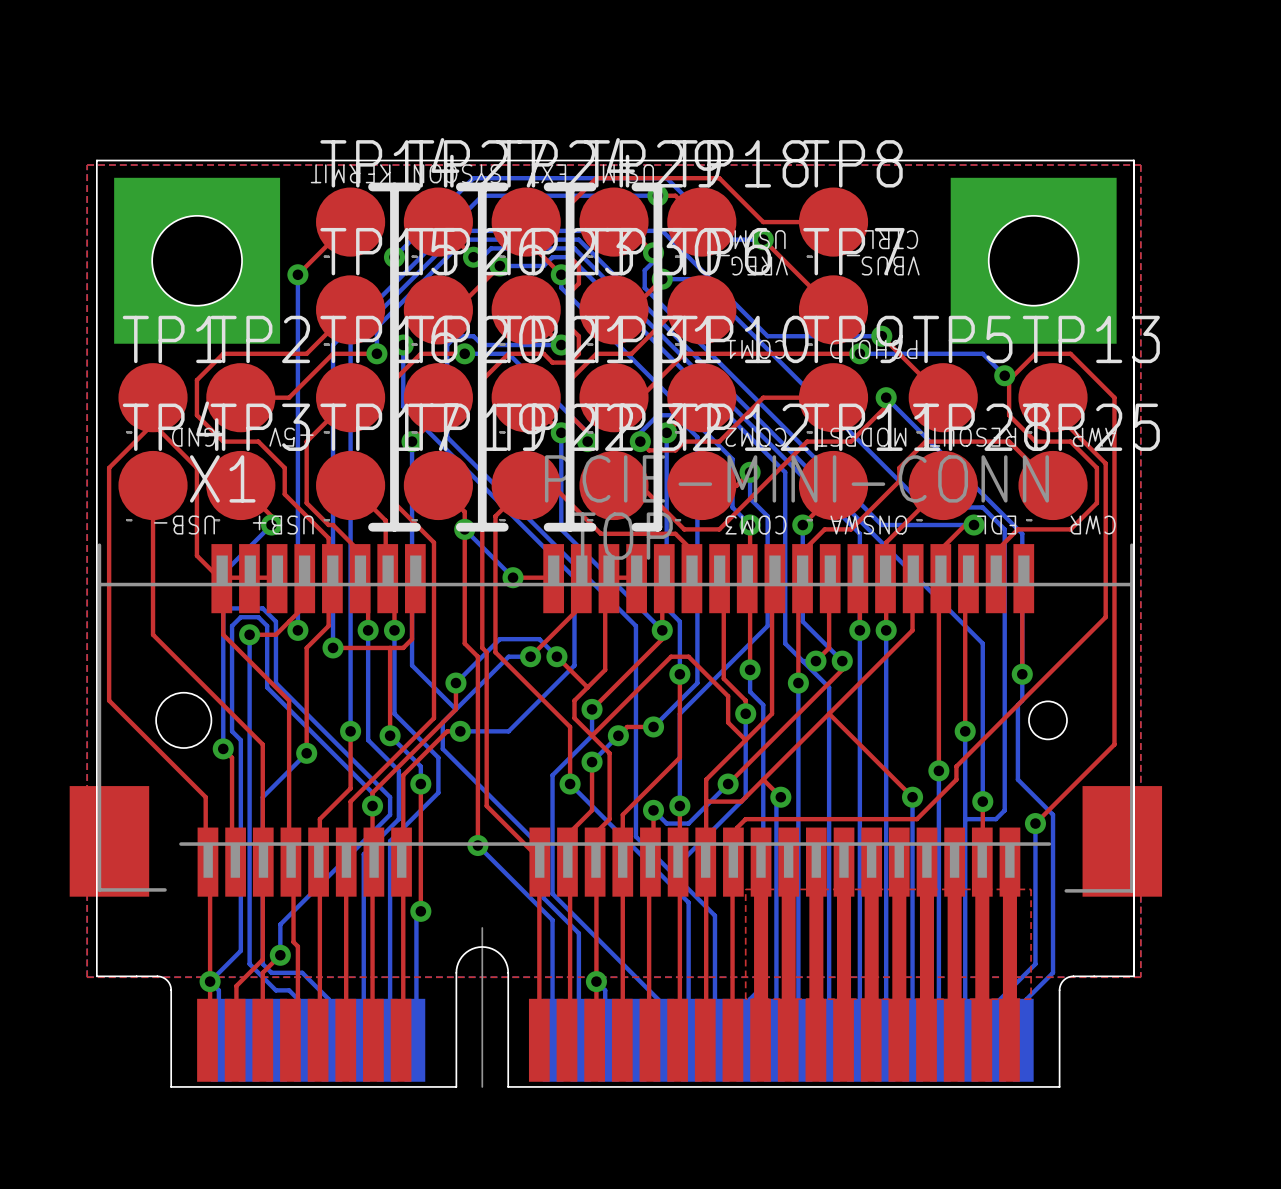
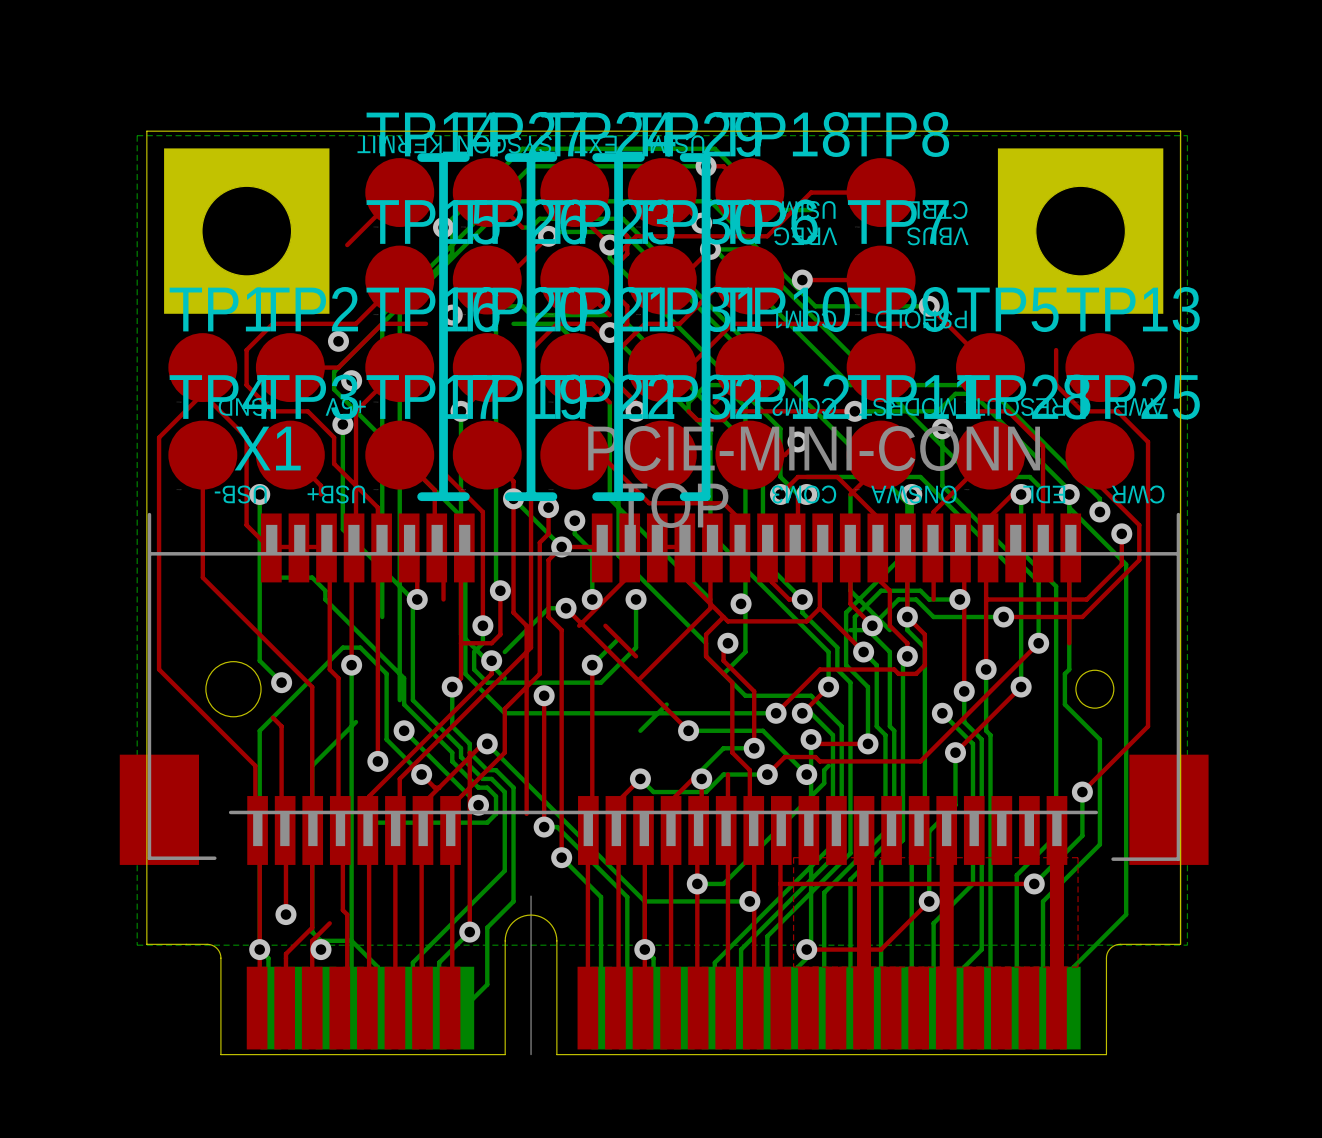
top zone outline: (87, 165) (1140, 165) (1140, 977) (87, 977) (87, 165) -> none
top track: (570, 204) (596, 178) (719, 178) (763, 222) -> (618, 253) (636, 236) (767, 236) (811, 192)
top track: (763, 239) (833, 309) -> (802, 280) (881, 280)
via: (763, 239) -> none
bottom track: (653, 252) (653, 261) (644, 270) (644, 287) (881, 525) (974, 525) -> none
bottom track: none -> (452, 227) (452, 253) (334, 371) (334, 389) (465, 520) (465, 673) (504, 713) (776, 713)
via: (473, 257) -> none
bottom track: (574, 261) (570, 257) (552, 257) (543, 265) (499, 265) -> (622, 231) (535, 231)
bottom track: (297, 274) (297, 630) -> none
via: (297, 274) -> none
bottom track: none -> (706, 253) (719, 253) (850, 385) (986, 385) (1099, 498) (1099, 511)
via: none -> (802, 280)
bottom track: (403, 345) (403, 406) (574, 577) (574, 665) (570, 669) -> none
via position: (561, 345) -> (609, 332)
bottom track: (376, 353) (376, 327) (464, 239) (578, 239) (982, 643) (982, 801) -> none
via: (376, 353) -> none
top track: (464, 353) (420, 353) (394, 380) -> none
via: (464, 353) -> none
bottom track: (859, 353) (982, 353) (1004, 375) -> none
via: (859, 353) -> none
bottom track: none -> (609, 332) (710, 433) (710, 533) (828, 652) (828, 687)
via: none -> (338, 341)
top track: (1004, 375) (1009, 380) (1035, 353) (1070, 353) (1114, 397) (1114, 744) (1101, 757) -> (1143, 437) (1148, 441) (1148, 726)
via: (1004, 375) -> none
top track: (833, 397) (763, 397) (719, 441) -> (854, 411) (767, 411)
top track: (886, 397) (886, 406) (851, 441) (807, 441) (719, 529) (684, 529) (640, 485) -> none
bottom track: (886, 397) (1022, 533) -> (854, 411) (937, 411) (955, 393) (973, 393) (1069, 490) (1069, 503)
via: (886, 397) -> none
via: none -> (351, 380)
top track: (1053, 410) (1105, 463) (1105, 617) (956, 766) (956, 779) (916, 819) (745, 819) (736, 827) (736, 858) (733, 862) -> none
bottom track: (732, 419) (785, 472) (785, 643) (829, 687) (829, 696) -> (959, 599) (929, 599) (920, 590) (881, 590) (854, 617) (854, 643) (876, 665)
via: (561, 432) -> none
bottom track: (666, 432) (666, 608) (679, 621) (679, 674) -> none
via: (666, 432) -> none
bottom track: (447, 437) (635, 625) (635, 836) (714, 915) (714, 1038) (719, 1040) -> (618, 306) (618, 315) (762, 459) (762, 560) (802, 599) (802, 612) (837, 647) (837, 669) (850, 682) (850, 853) (767, 936) (767, 1008)
bottom track: none -> (496, 406) (496, 586) (500, 590)
via: (640, 441) -> none
via: none -> (854, 411)
top track: (925, 441) (899, 467) (899, 481) (851, 529) (824, 529) (802, 551) (802, 577) (798, 582) (798, 683) -> none
top track: (960, 441) (1009, 441) (1053, 485) -> (1008, 411) (1043, 446) (1043, 547)
via: none -> (342, 424)
bottom track: none -> (942, 428) (942, 485) (1038, 582) (1038, 643)
via: none -> (942, 428)
top track: (1096, 467) (1096, 503) (1070, 529) (1017, 529) (1000, 546) (1000, 577) (996, 578) -> none
bottom track: (750, 472) (750, 498) (767, 516) (767, 625) (679, 713) (679, 805) -> none
top track: (526, 485) (495, 516) (495, 652) (570, 726) (570, 784) -> none
top track: none -> (1099, 455) (1099, 485) (1139, 525) (1139, 560) (1082, 617) (1003, 617)
top track: (306, 503) (328, 525) (333, 525) (359, 551) (360, 578) -> (355, 472) (355, 546) (354, 547)
bottom track: none -> (806, 476) (920, 476) (1021, 577) (1021, 687)
bottom track: (991, 516) (1004, 529) (1004, 810) (995, 819) (965, 819) -> none
bottom track: none -> (259, 494) (259, 660) (281, 682)
via: none -> (259, 494)
bottom track: (271, 525) (223, 573) (223, 748) -> none
via: (271, 525) -> none
top track: none -> (780, 494) (797, 476) (837, 476) (876, 516) (876, 546) (881, 551) (881, 582) (889, 590) (889, 625) (907, 643) (907, 656)
via: none -> (780, 494)
via: (750, 525) -> none
via: none -> (806, 494)
via: (802, 525) -> none
bottom track: none -> (911, 494) (911, 546) (846, 612) (846, 652)
via: none -> (911, 494)
via: none -> (1069, 494)
via: none -> (548, 507)
via: none -> (1099, 511)
bottom track: none -> (574, 520) (574, 533) (592, 551) (592, 599)
via: none -> (574, 520)
top track: none -> (1121, 533) (1121, 564) (1086, 599) (986, 599)
via: none -> (1121, 533)
top track: none -> (561, 546) (548, 560) (548, 617) (561, 630) (561, 857)
top track: (221, 578) (223, 634) (289, 700) (289, 709) -> (326, 547) (329, 551) (329, 669) (338, 678)
top track: (608, 578) (605, 582) (605, 669) (574, 700) (574, 718) (609, 753) (609, 819) (596, 832) (595, 862) -> none
top track: none -> (684, 547) (688, 551) (688, 582) (727, 621) (806, 621) (819, 608) (863, 652)
top track: (747, 578) (750, 582) (750, 669) -> none
top track: none -> (850, 547) (850, 603) (872, 625)
top track: (830, 578) (829, 647) (815, 661) -> none
top track: (913, 578) (912, 630) (741, 801) (706, 801) -> (960, 547) (964, 551) (964, 691)
top track: (968, 578) (965, 582) (965, 731) -> none
top track: (153, 608) (153, 634) (262, 744) -> (202, 577) (312, 687) (312, 713)
top track: (302, 608) (275, 634) (249, 634) -> (351, 577) (351, 665)
top track: (723, 612) (723, 678) (745, 700) (745, 713) -> (771, 582) (789, 599) (802, 599)
top track: none -> (500, 590) (500, 634) (491, 643) (461, 643)
via: none -> (500, 590)
top track: (328, 625) (306, 647) (306, 753) -> (377, 595) (377, 761)
bottom track: (275, 630) (275, 683) (354, 762) -> (325, 599) (404, 678) (404, 704) (452, 752) (452, 761) (478, 787) (487, 787) (496, 796) (496, 813) (487, 822) (377, 822)
via: (297, 630) -> none
bottom track: (368, 630) (368, 740) (398, 770) (398, 819) (363, 854) (363, 994) -> (342, 424) (342, 529) (412, 599) (412, 700) (461, 748) (461, 757) (482, 778) (491, 778) (504, 792) (504, 870) (412, 962)
bottom track: (394, 630) (394, 713) (438, 757) (438, 792) (390, 841) (390, 994) -> (469, 932) (439, 962)
via: (394, 630) -> none
via: none -> (592, 599)
bottom track: none -> (636, 599) (636, 647) (601, 682) (487, 682) (474, 669) (474, 652) (482, 643) (482, 625)
via: none -> (636, 599)
via position: (662, 630) -> (741, 603)
via: none -> (802, 599)
top track: none -> (907, 599) (907, 617) (924, 634) (924, 665) (916, 673) (898, 673) (894, 669) (819, 669) (776, 713)
via: (859, 630) -> none
bottom track: (886, 630) (886, 955) -> (942, 713) (973, 743) (973, 883) (933, 923)
via: (886, 630) -> none
via: none -> (959, 599)
bottom track: (249, 634) (249, 964) (275, 990) (289, 990) (302, 1003) -> (351, 665) (351, 971)
via: (249, 634) -> none
top track: (412, 639) (403, 647) (333, 647) -> (461, 608) (461, 678) (452, 687)
top track: none -> (566, 608) (688, 730)
bottom track: (517, 639) (539, 639) (556, 656) -> none
top track: (772, 639) (772, 713) (706, 779) (705, 862) -> (723, 617) (706, 634) (706, 656) (732, 682) (732, 752) (749, 770) (749, 827) (753, 830)
via: (333, 647) -> none
top track: (390, 647) (390, 735) -> none
top track: (482, 647) (486, 652) (486, 805) (539, 858) (539, 862) -> (592, 665) (592, 827) (588, 830)
via: none -> (907, 617)
via: none -> (1003, 617)
top track: (434, 656) (434, 718) (350, 801) (350, 810) -> (531, 617) (531, 647) (399, 778)
via: none -> (482, 625)
bottom track: (530, 656) (508, 656) (442, 722) (442, 748) (543, 849) (543, 898) (578, 933) -> (544, 827) (557, 827) (627, 897) (627, 901)
via position: (530, 656) -> (566, 608)
via: (556, 656) -> none
via: none -> (872, 625)
via: (815, 661) -> none
top track: (842, 661) (842, 669) (728, 784) -> none
via: (842, 661) -> none
bottom track: (859, 661) (859, 1038) -> (907, 630) (924, 647) (924, 822) (911, 835) (911, 1002) (907, 1006)
bottom track: (750, 669) (750, 691) (763, 705) (763, 770) -> none
via: (750, 669) -> none
top track: (679, 674) (679, 757) (622, 814) (622, 832) -> (697, 774) (671, 800)
top track: none -> (1038, 643) (920, 761) (819, 761) (815, 757) (784, 757) (767, 774)
via position: (1022, 674) -> (1038, 643)
top track: none -> (723, 647) (723, 660) (754, 691) (754, 748)
top track: (455, 683) (455, 709) (372, 792) (373, 862) -> (487, 743) (482, 743) (426, 800) (426, 827) (422, 830)
via position: (455, 683) -> (491, 660)
via position: (798, 683) -> (863, 652)
via: none -> (907, 656)
via: none -> (351, 665)
bottom track: (543, 696) (508, 731) (460, 731) -> none
via: none -> (592, 665)
bottom track: (798, 696) (798, 1038) (802, 1040) -> (1003, 617) (933, 617) (916, 599) (898, 599) (872, 625) (872, 634) (889, 652) (889, 726) (894, 730) (894, 835) (850, 879) (849, 1008)
bottom track: none -> (846, 665) (867, 687) (867, 743)
top track: (938, 700) (938, 770) -> none
via: none -> (986, 669)
bottom track: (675, 705) (653, 726) -> none
bottom track: (592, 709) (592, 735) (552, 775) (552, 893) (662, 1003) (663, 1040) -> (802, 713) (811, 713) (832, 735) (832, 844) (714, 962) (714, 1006) (711, 1008)
via: (592, 709) -> none
bottom track: (745, 713) (745, 797) (671, 871) -> none
via: (745, 713) -> none
top track: (829, 713) (912, 797) -> none
top track: none -> (828, 687) (802, 713)
via: none -> (828, 687)
top track: none -> (1021, 687) (955, 752)
via: none -> (964, 691)
top track: none -> (544, 695) (544, 827)
via: none -> (544, 695)
top track: (653, 726) (627, 726) (618, 735) -> none
via: (653, 726) -> none
top track: (350, 731) (350, 788) (319, 819) (319, 827) -> (491, 660) (491, 673) (369, 796)
via: (350, 731) -> none
top track: (460, 731) (447, 731) (403, 775) (403, 836) -> (548, 507) (548, 533) (539, 542) (539, 673) (504, 708) (504, 752) (452, 805)
via: (460, 731) -> none
bottom track: (965, 731) (965, 1038) (967, 1040) -> (1021, 494) (1021, 551) (1056, 586) (1056, 835) (1016, 875) (1016, 1006) (1015, 1008)
via position: (965, 731) -> (1021, 687)
bottom track: (390, 735) (420, 766) (420, 775) -> (452, 687) (452, 726) (469, 743)
via position: (390, 735) -> (452, 687)
top track: (592, 735) (671, 656) (688, 656) (728, 696) (728, 722) (745, 740) -> none
via: (618, 735) -> none
bottom track: (1017, 735) (1017, 779) (1053, 814) -> (1064, 704) (1099, 739) (1099, 783)
via: none -> (776, 713)
via: none -> (802, 713)
via: none -> (942, 713)
via position: (223, 748) -> (281, 682)
via: (306, 753) -> none
bottom track: (829, 757) (829, 1040) -> (907, 656) (902, 660) (902, 840) (881, 862) (881, 1006) (877, 1008)
via: none -> (404, 730)
top track: (592, 762) (592, 810) -> none
via: (592, 762) -> none
bottom track: none -> (688, 730) (762, 730) (806, 774)
via: none -> (688, 730)
top track: none -> (811, 739) (815, 743) (867, 743)
via: none -> (811, 739)
bottom track: (938, 770) (940, 1040) -> (986, 669) (986, 730) (990, 735) (990, 1006) (987, 1008)
via: (938, 770) -> none
bottom track: none -> (487, 743) (644, 901)
via: none -> (867, 743)
bottom track: none -> (754, 748) (723, 748) (697, 774)
via: none -> (754, 748)
top track: (763, 779) (780, 797) -> none
via position: (420, 784) -> (487, 743)
bottom track: (570, 784) (688, 902) (688, 1038) (691, 1040) -> (618, 428) (618, 555) (706, 643) (706, 656) (745, 695) (811, 695) (841, 726) (841, 848) (741, 949) (741, 1006) (739, 1008)
via: (570, 784) -> none
bottom track: (728, 784) (688, 823) (666, 823) (653, 810) -> none
via: (728, 784) -> none
bottom track: none -> (955, 752) (955, 805) (929, 831) (929, 901)
via: none -> (377, 761)
bottom track: (390, 797) (390, 814) (280, 924) (280, 955) -> (439, 765) (478, 805)
via: (780, 797) -> none
bottom track: (912, 797) (912, 1040) -> (964, 691) (964, 722) (981, 739) (981, 949) (964, 967) (964, 1006) (960, 1008)
via position: (912, 797) -> (955, 752)
top track: (982, 801) (982, 1040) -> none
via: (982, 801) -> none
bottom track: (372, 805) (372, 792) (267, 687) (267, 625) (258, 617) (240, 617) (232, 625) (232, 731) (240, 740) (240, 950) (210, 981) -> (426, 778) (386, 739) (386, 673) (360, 647) (342, 647) (259, 730) (259, 949)
via: (679, 805) -> none
bottom track: none -> (767, 774) (723, 774) (706, 792) (653, 792) (640, 778)
via: none -> (767, 774)
via: none -> (806, 774)
top track: none -> (426, 778) (434, 787) (439, 787)
via: none -> (640, 778)
bottom track: (776, 814) (776, 924) -> (876, 726) (885, 735) (885, 831) (824, 892)
bottom track: none -> (824, 783) (723, 883) (697, 883)
via: none -> (478, 805)
bottom track: (477, 845) (552, 920) (552, 928) -> (561, 857) (601, 897)
via position: (477, 845) -> (544, 827)
top track: none -> (285, 830) (285, 914)
top track: (788, 862) (788, 1040) -> none
top track: (871, 862) (871, 1040) -> none
top track: (926, 862) (926, 1040) -> none
top track: (954, 862) (954, 1040) -> none
top track: (767, 863) (761, 862) (761, 1040) -> none
top track: (837, 863) (844, 862) (844, 1040) -> none
bottom track: (1035, 867) (1035, 964) (995, 1003) -> (1099, 844) (1043, 901) (1043, 971)
bottom track: none -> (1082, 835) (1034, 883)
bottom track: (1053, 876) (1053, 972) -> (1069, 507) (1126, 564) (1126, 914) (1099, 940)
via: none -> (561, 857)
top track: none -> (469, 879) (469, 932)
bottom track: (420, 911) (416, 915) (416, 1038) -> (469, 752) (487, 770) (496, 770) (513, 787) (513, 901) (487, 927) (487, 984) (465, 1006)
via: (420, 911) -> none
via: none -> (697, 883)
top track: none -> (780, 883) (1034, 883)
via: none -> (1034, 883)
bottom track: none -> (644, 901) (749, 901)
via: none -> (749, 901)
top track: none -> (929, 901) (881, 949) (806, 949)
via: none -> (929, 901)
via: none -> (285, 914)
via: (280, 955) -> none
via: none -> (469, 932)
via: none -> (320, 949)
via: none -> (806, 949)

